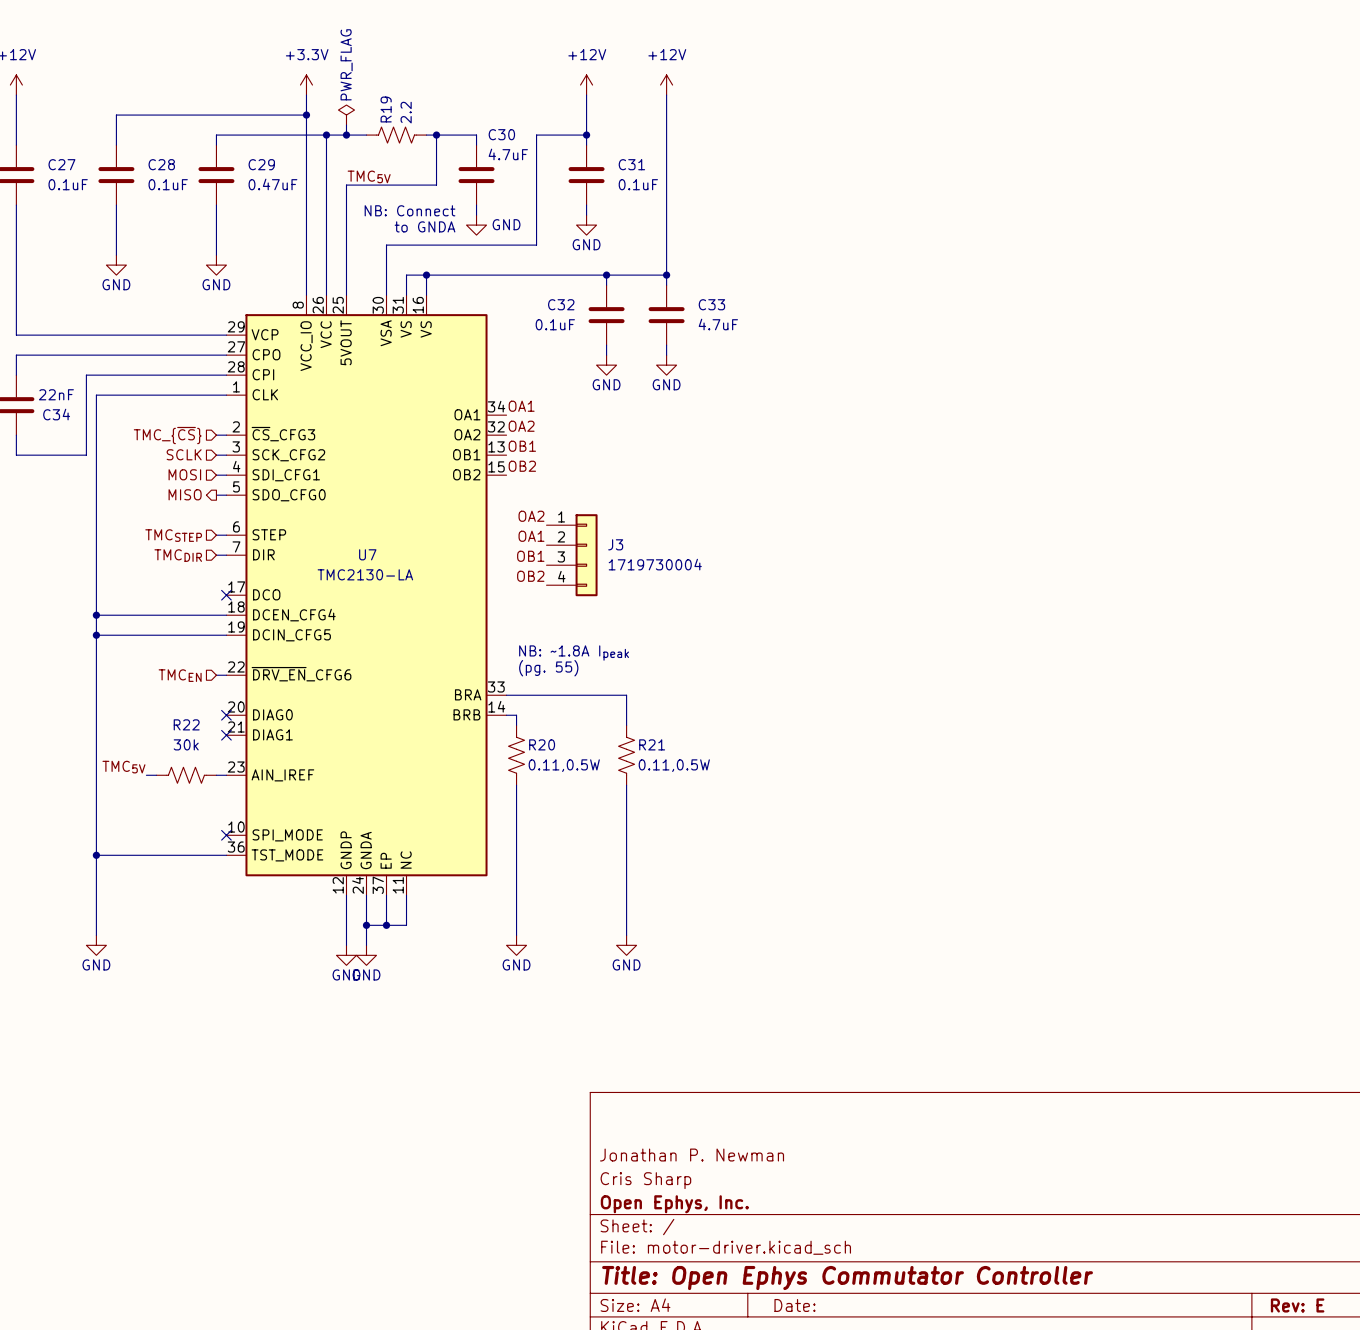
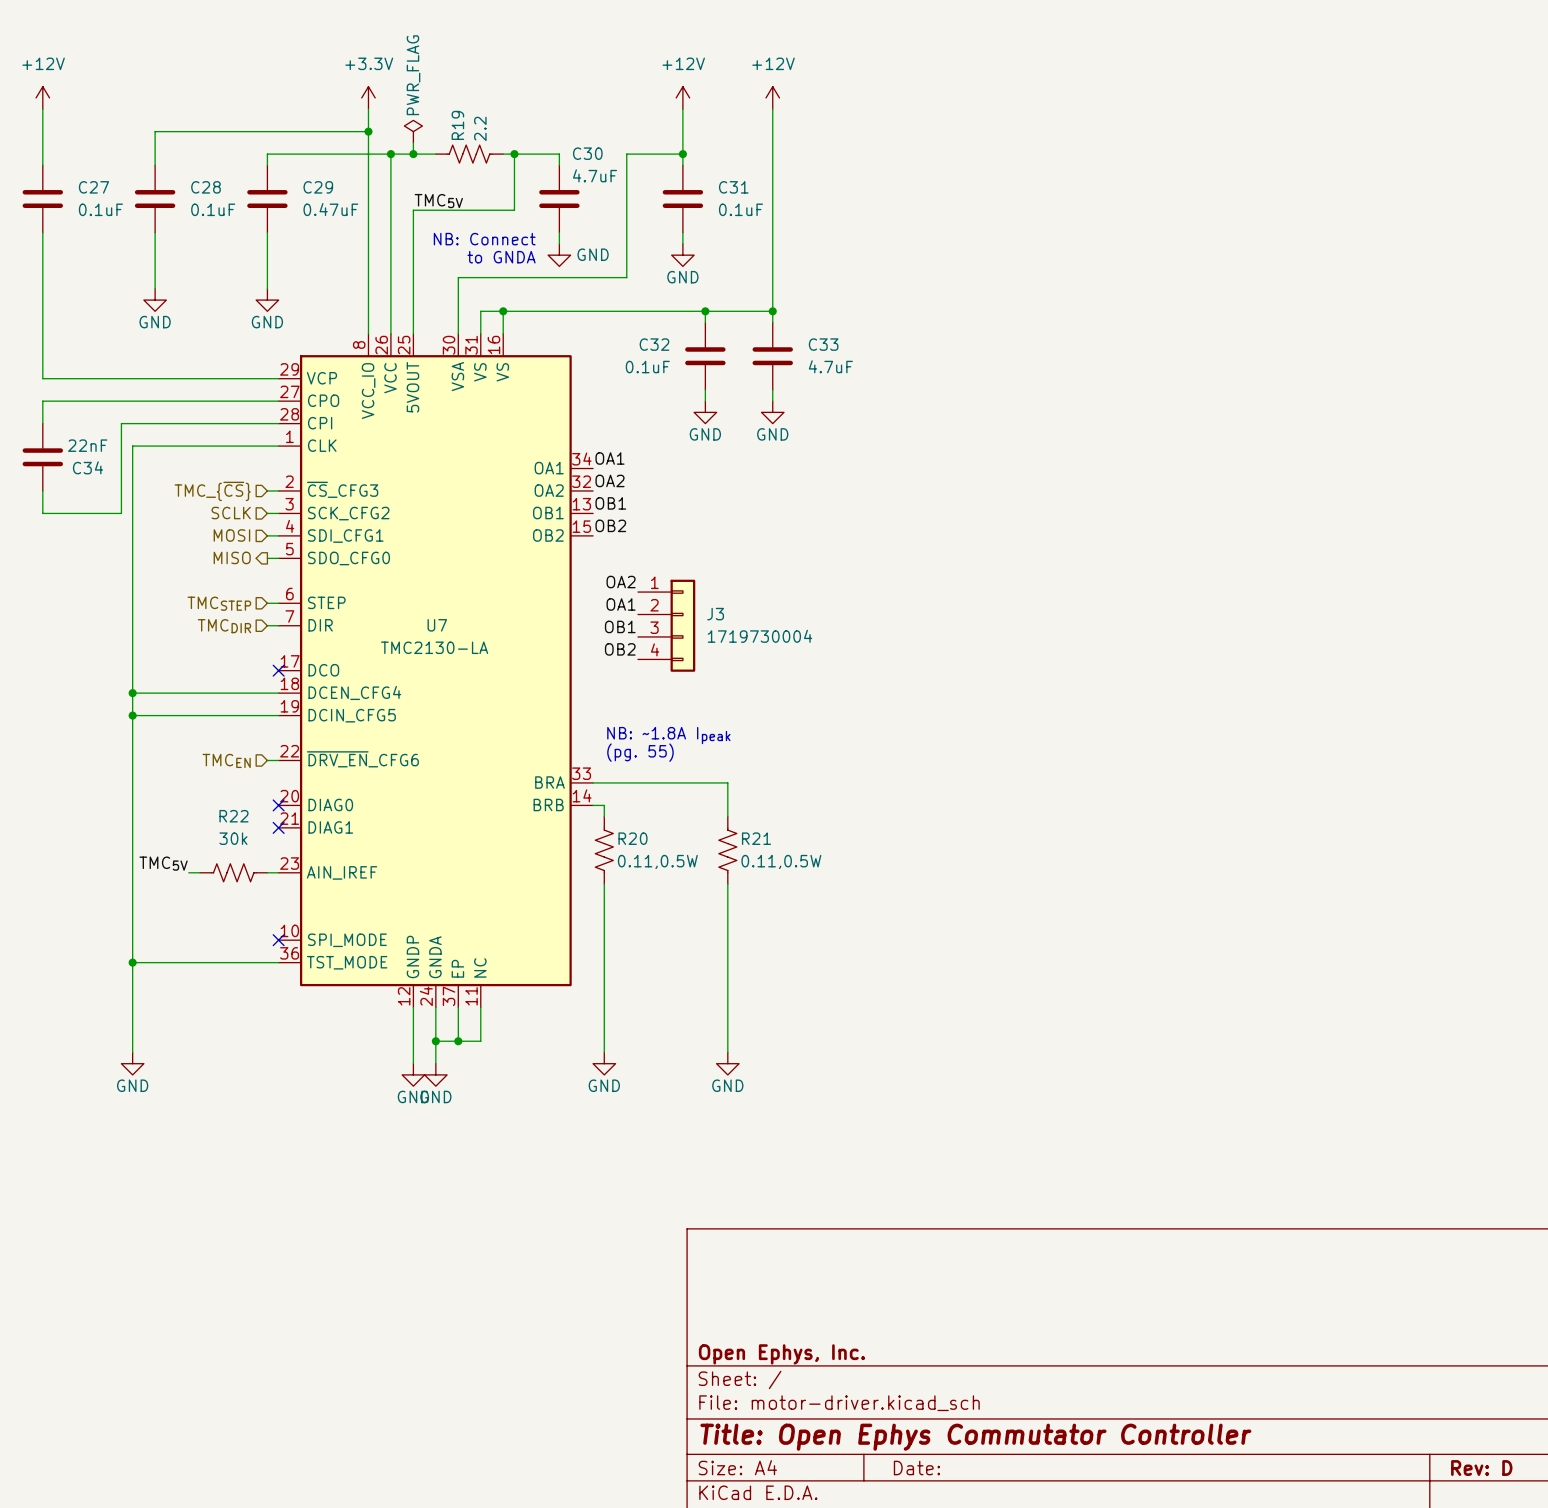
title block: Jonathan P. Newman (692, 1155) -> none
title block: Cris Sharp (645, 1180) -> none
title block: Rev: E (1297, 1305) -> Rev: D (1481, 1468)

